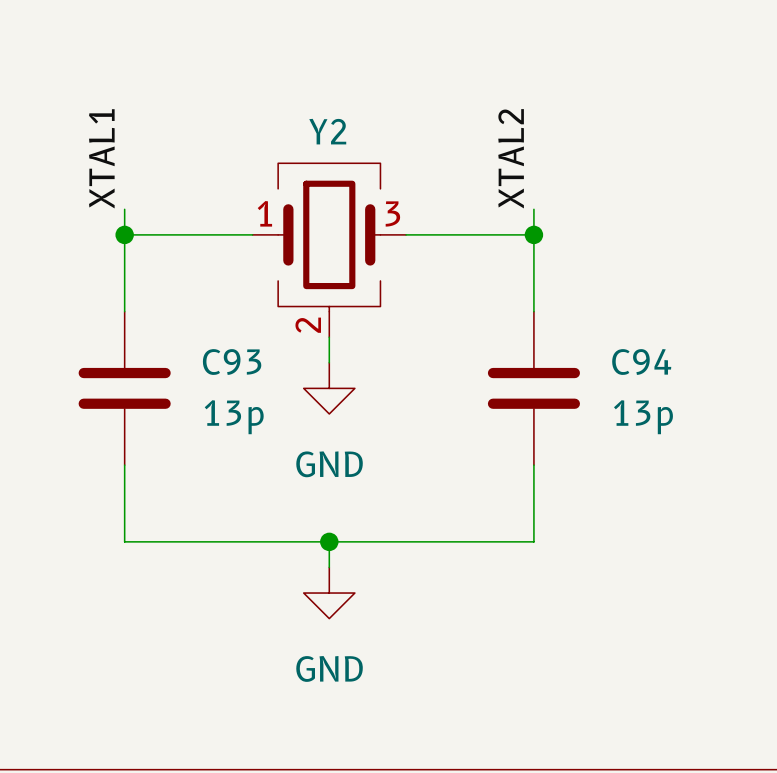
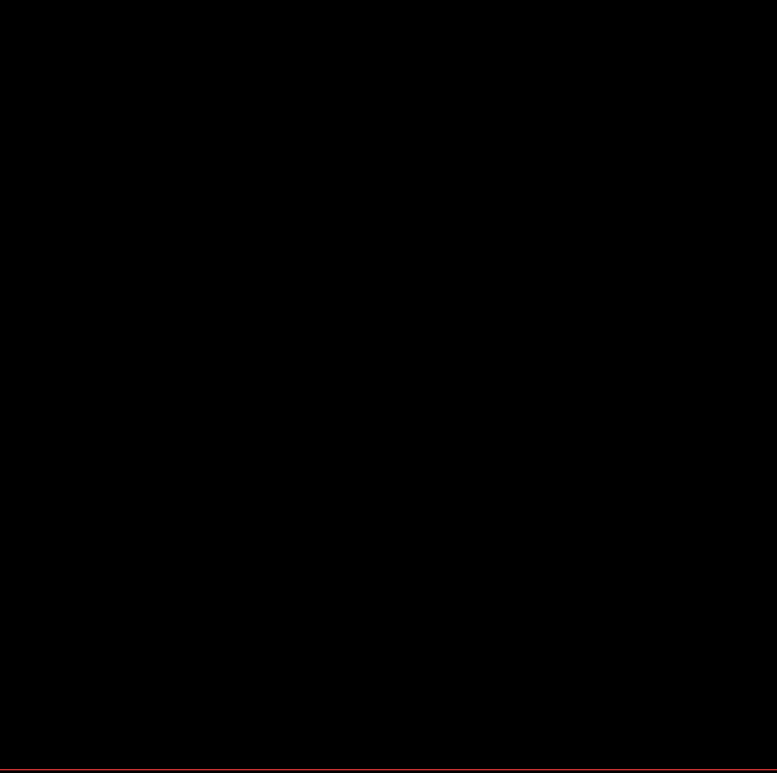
label: XTAL1 (101, 158) -> none
label: XTAL2 (511, 158) -> none
wire: (124, 209) (124, 311) -> none
wire: (533, 209) (533, 311) -> none
wire: (124, 234) (252, 234) -> none
junction: (124, 234) -> none
wire: (406, 234) (533, 234) -> none
junction: (533, 234) -> none
Y2: (329, 250) -> none
wire: (329, 337) (329, 362) -> none
C93: 13p (124, 388) -> none
power symbol: GND (329, 388) -> none
C94: 13p (533, 388) -> none
wire: (124, 465) (124, 541) (533, 541) (533, 465) -> none
wire: (329, 541) (329, 567) -> none
junction: (329, 541) -> none
power symbol: GND (329, 593) -> none

